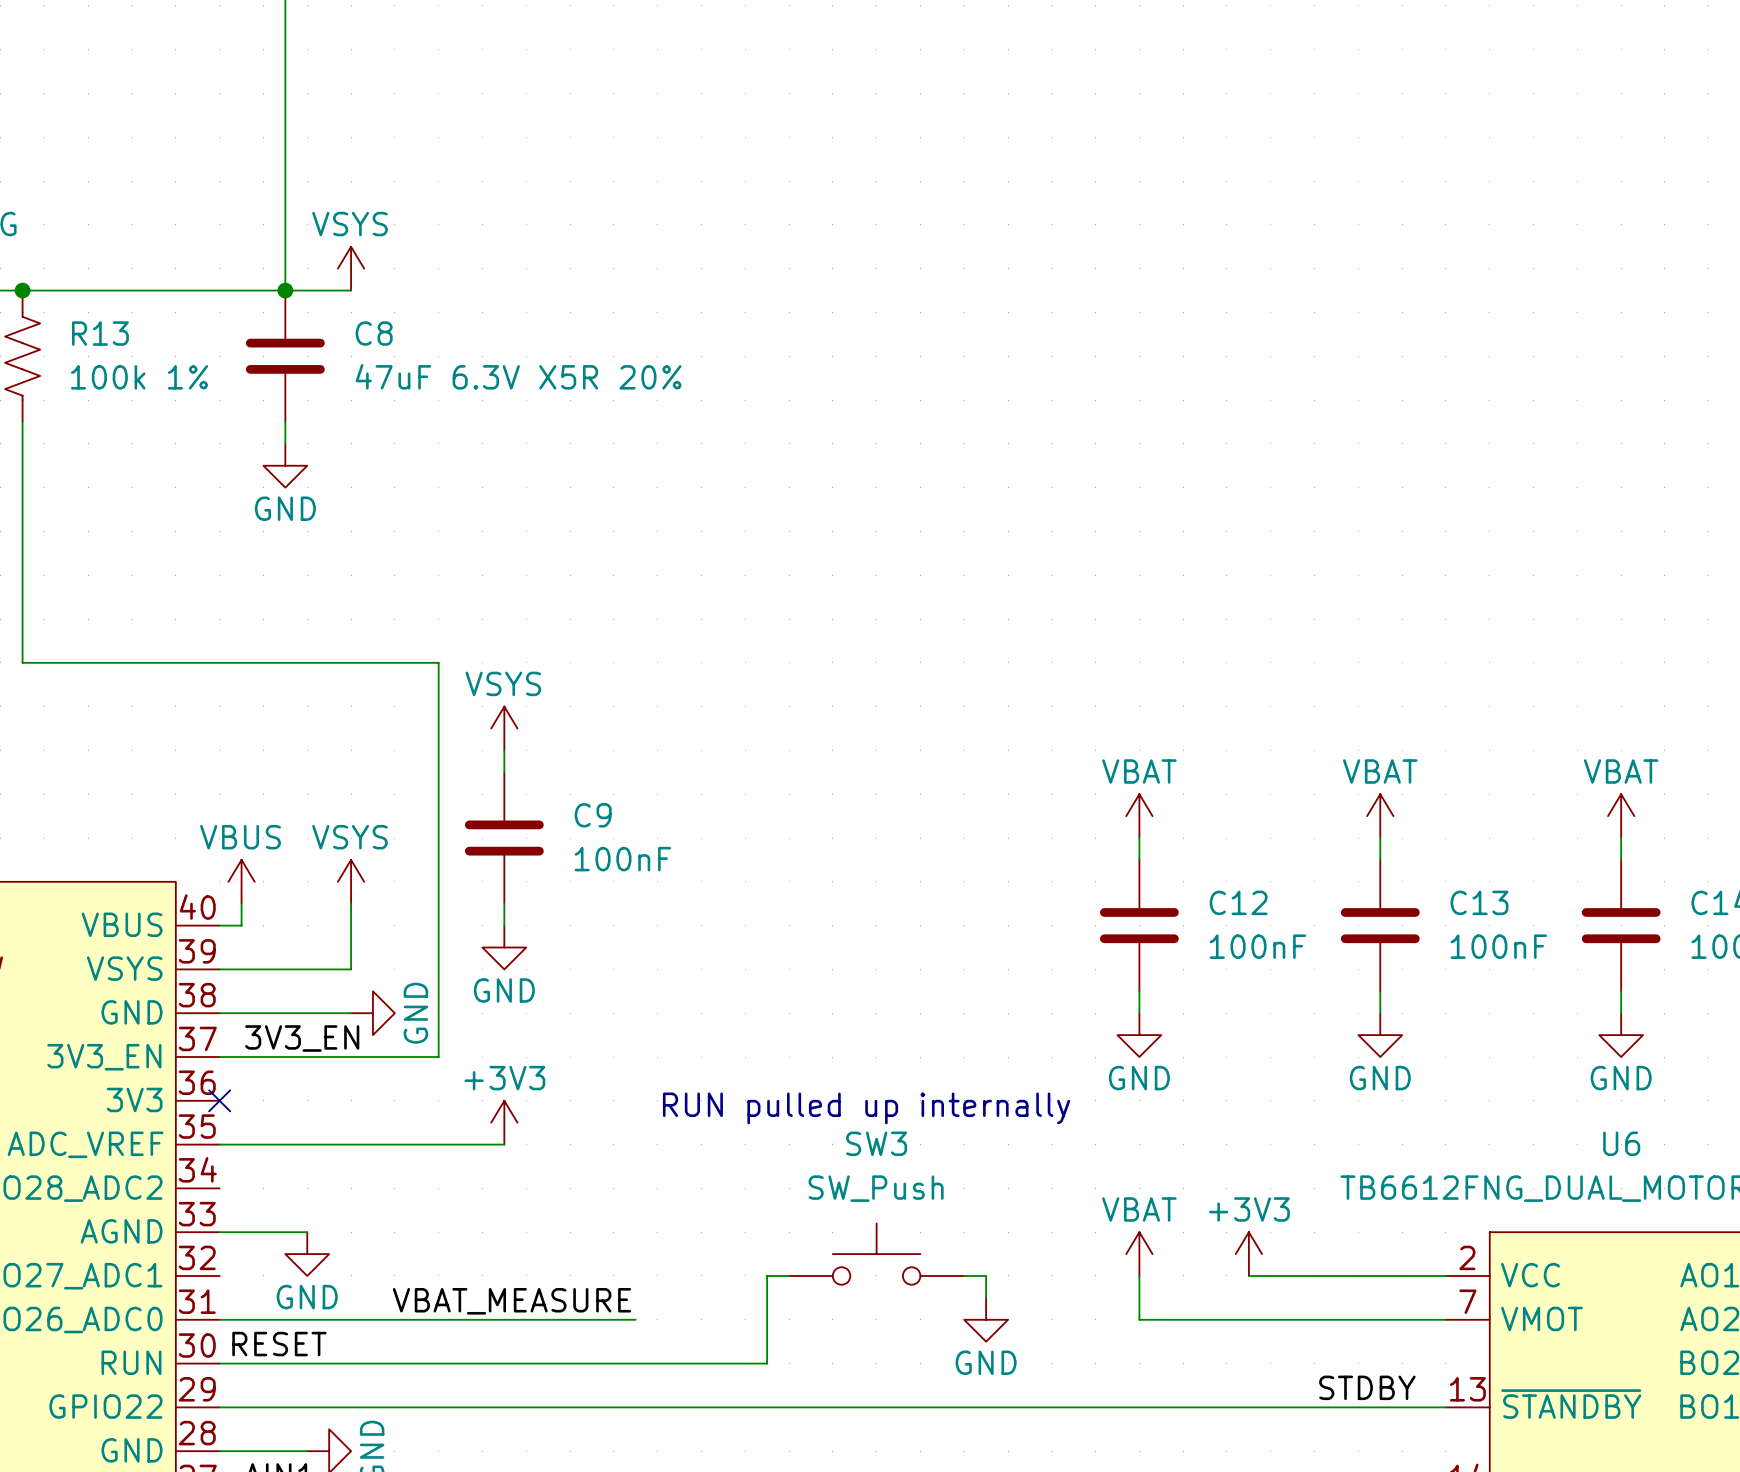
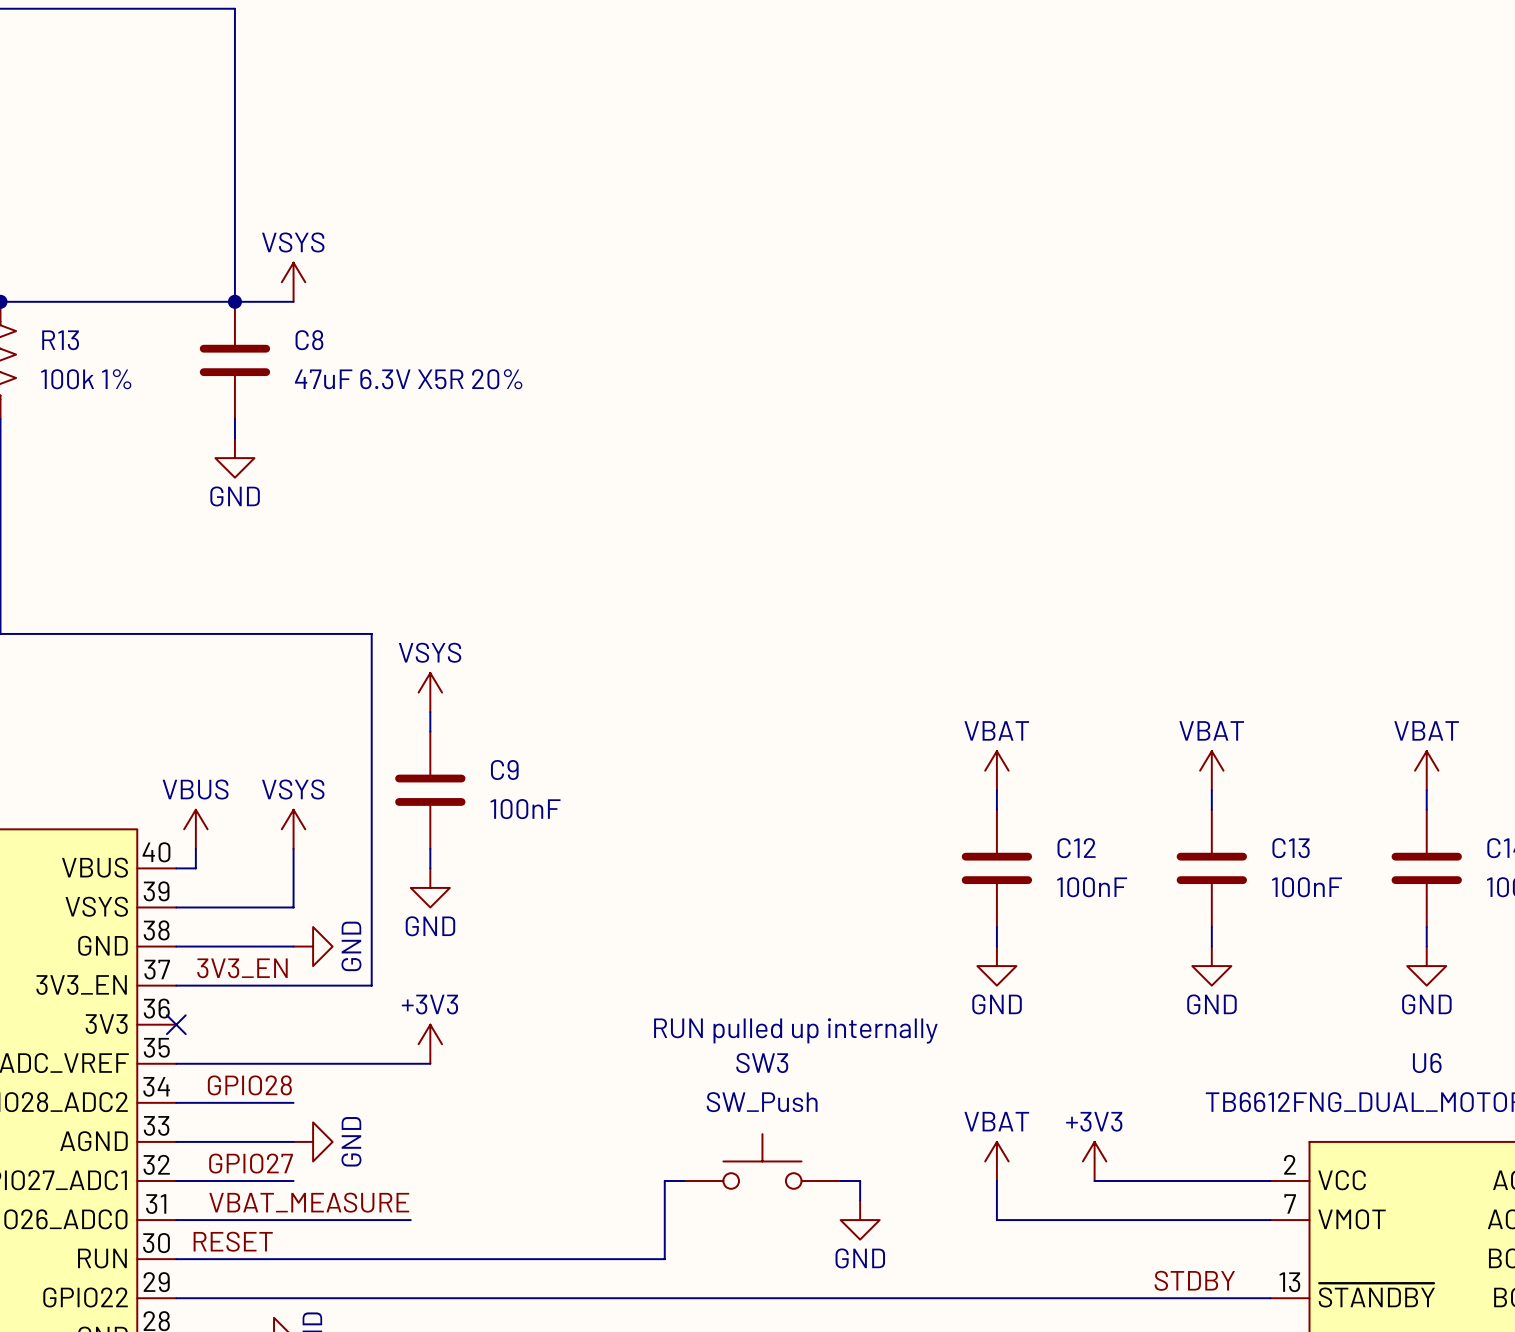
label: none -> GPIO28 (249, 1085)
wire: none -> (176, 1102) (293, 1102)
wire: none -> (254, 1141) (293, 1141)
power symbol rotation: 0° (307, 1254) -> 90° counterclockwise (313, 1141)
power symbol position: GND (307, 1254) -> GND (313, 1141)
label: none -> GPIO27 (251, 1163)
wire: none -> (176, 1181) (293, 1181)
label position: VBAT_MEASURE (512, 1301) -> VBAT_MEASURE (309, 1202)
wire: (482, 1319) (635, 1319) -> none

